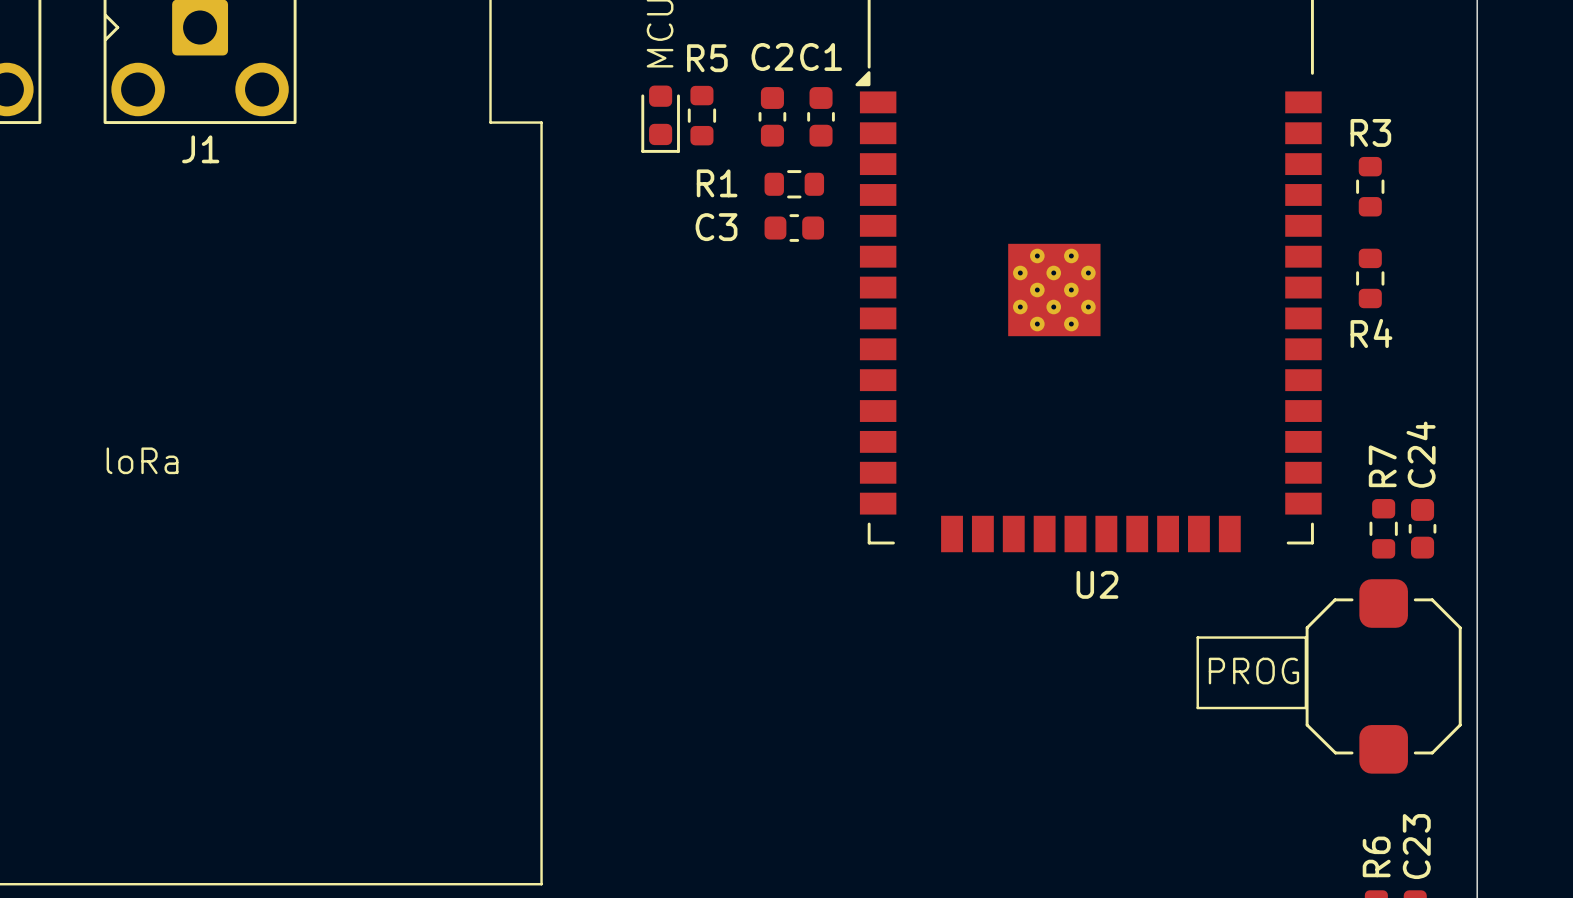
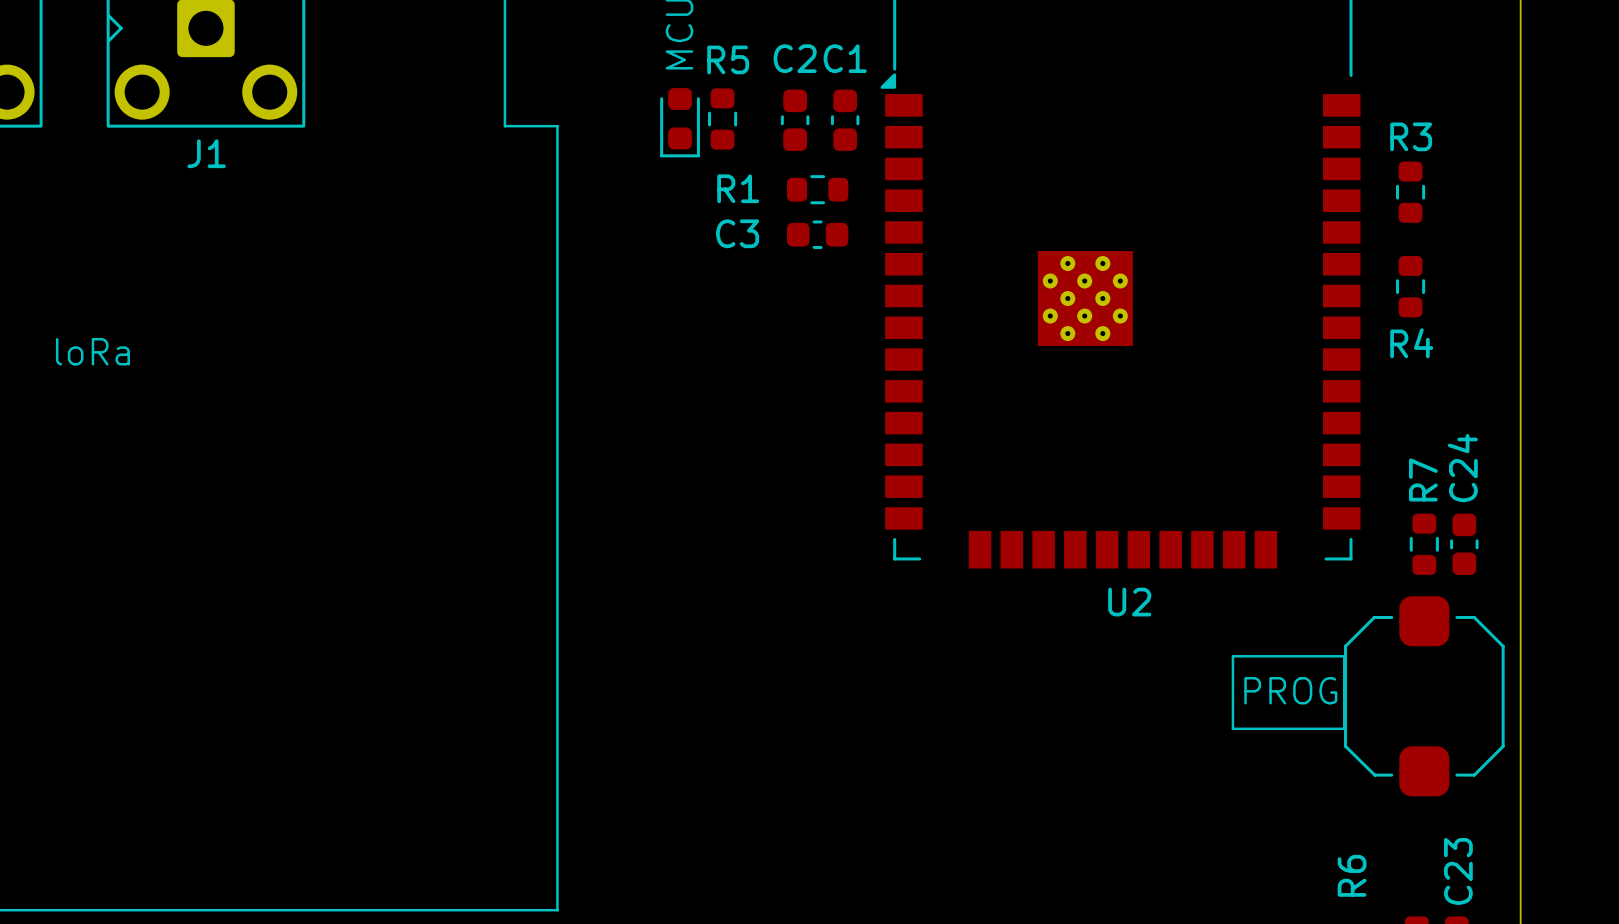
text position: loRa (142, 460) -> loRa (92, 351)
R6 name position: R6 (1376, 856) -> R6 (1352, 875)

